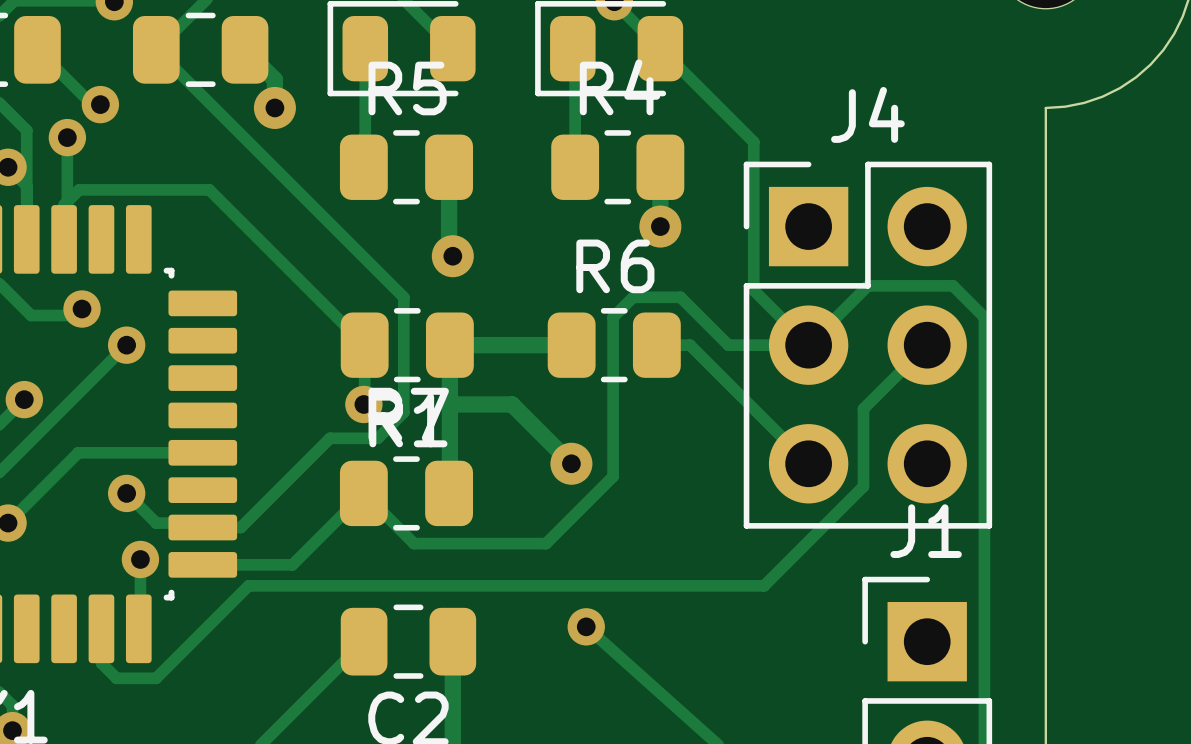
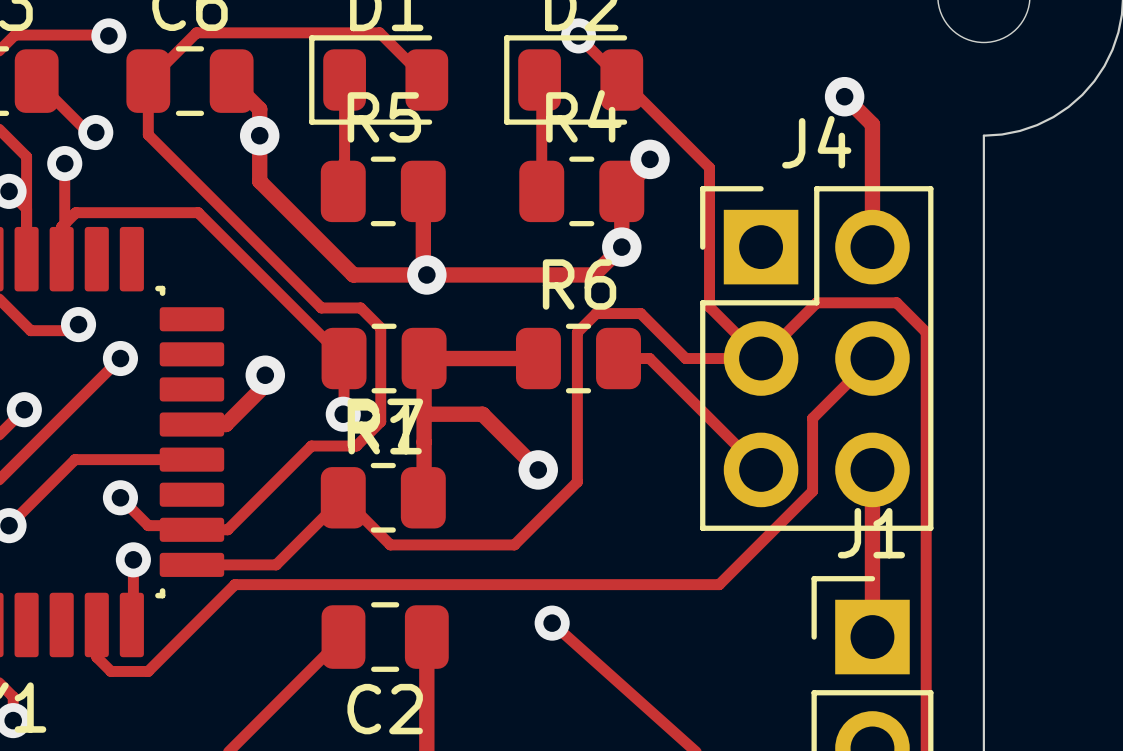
track: (156, 49) (403, 297) (403, 312) -> (148, 81) (148, 134) (321, 307) (360, 307) (380, 328)
track: none -> (844, 96) (872, 124) (872, 247)
via: none -> (844, 96)
track: none -> (259, 135) (259, 181) (353, 274) (593, 274) (621, 247)
via: none -> (650, 159)
track: none -> (265, 375) (265, 385) (225, 424) (191, 424)
via: none -> (265, 375)
track: none -> (872, 469) (872, 637)

